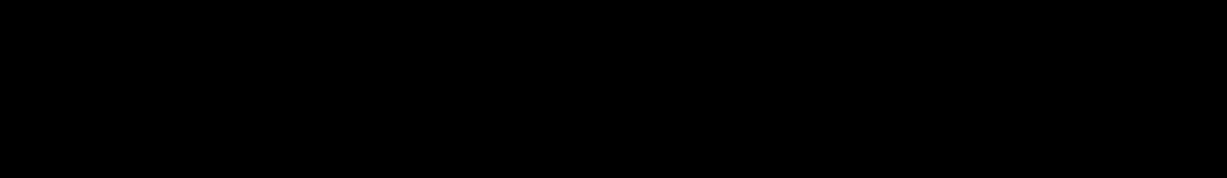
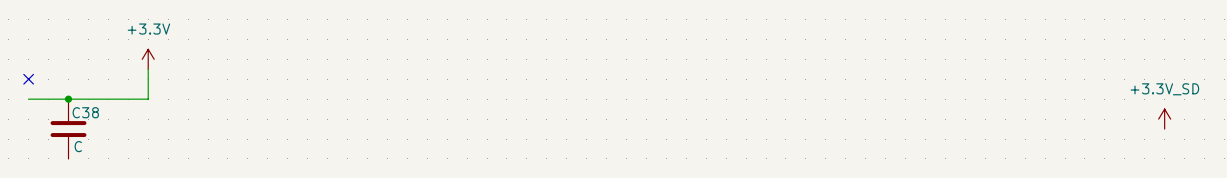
power symbol: none -> +3.3V (148, 59)
wire: none -> (148, 69) (148, 99) (28, 99)
no-connect mark: none -> (28, 79)
junction: none -> (68, 99)
power symbol: none -> +3.3V_SD (1164, 119)
C38: none -> C (68, 129)

